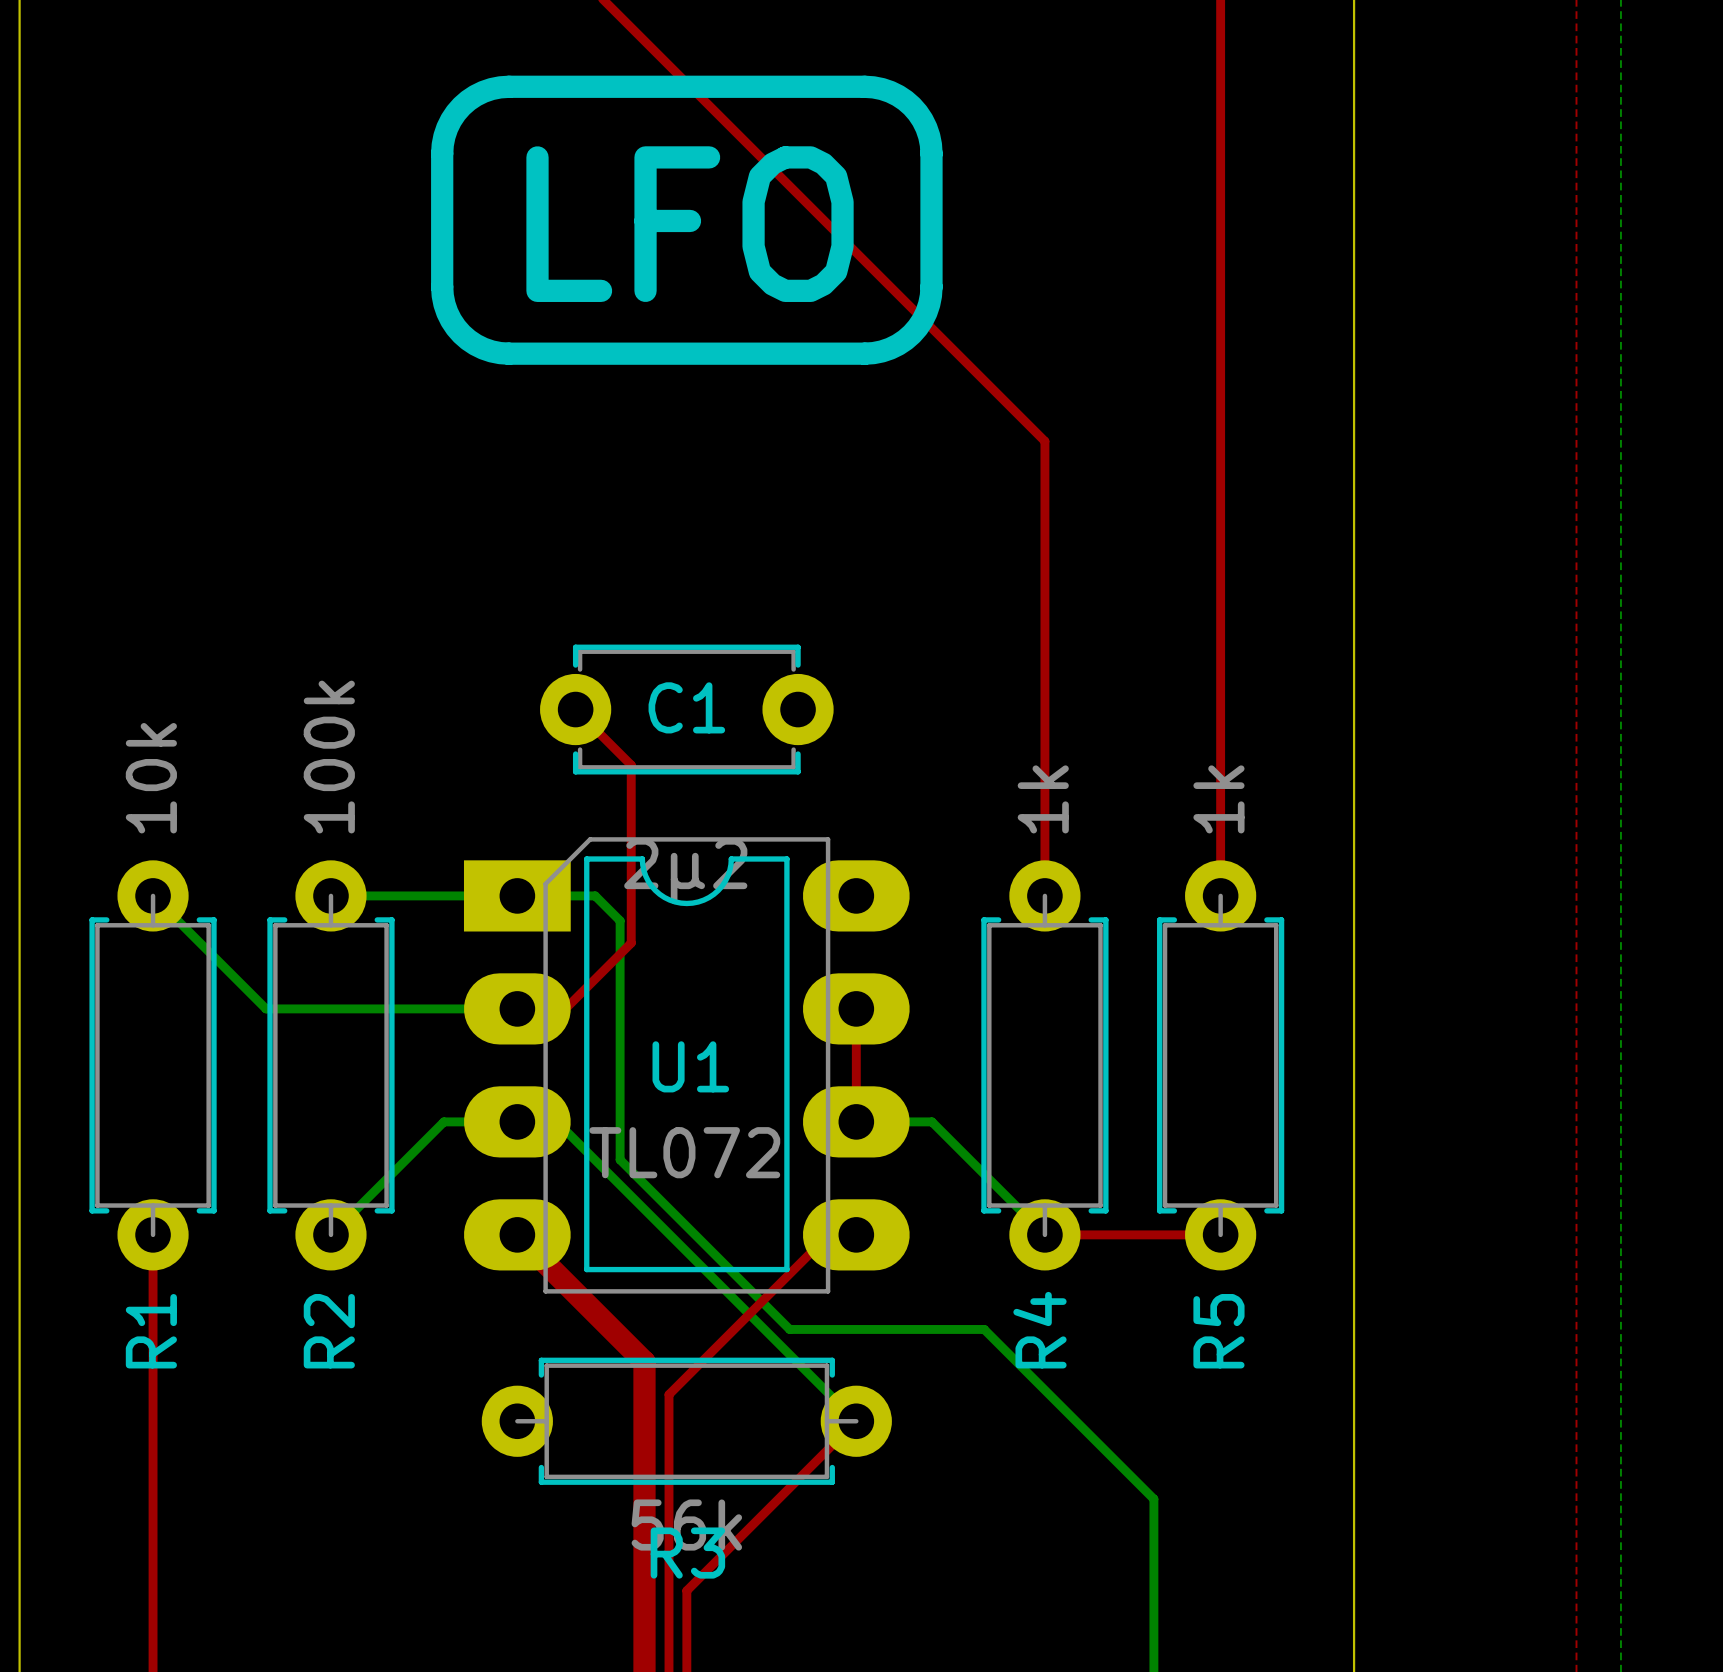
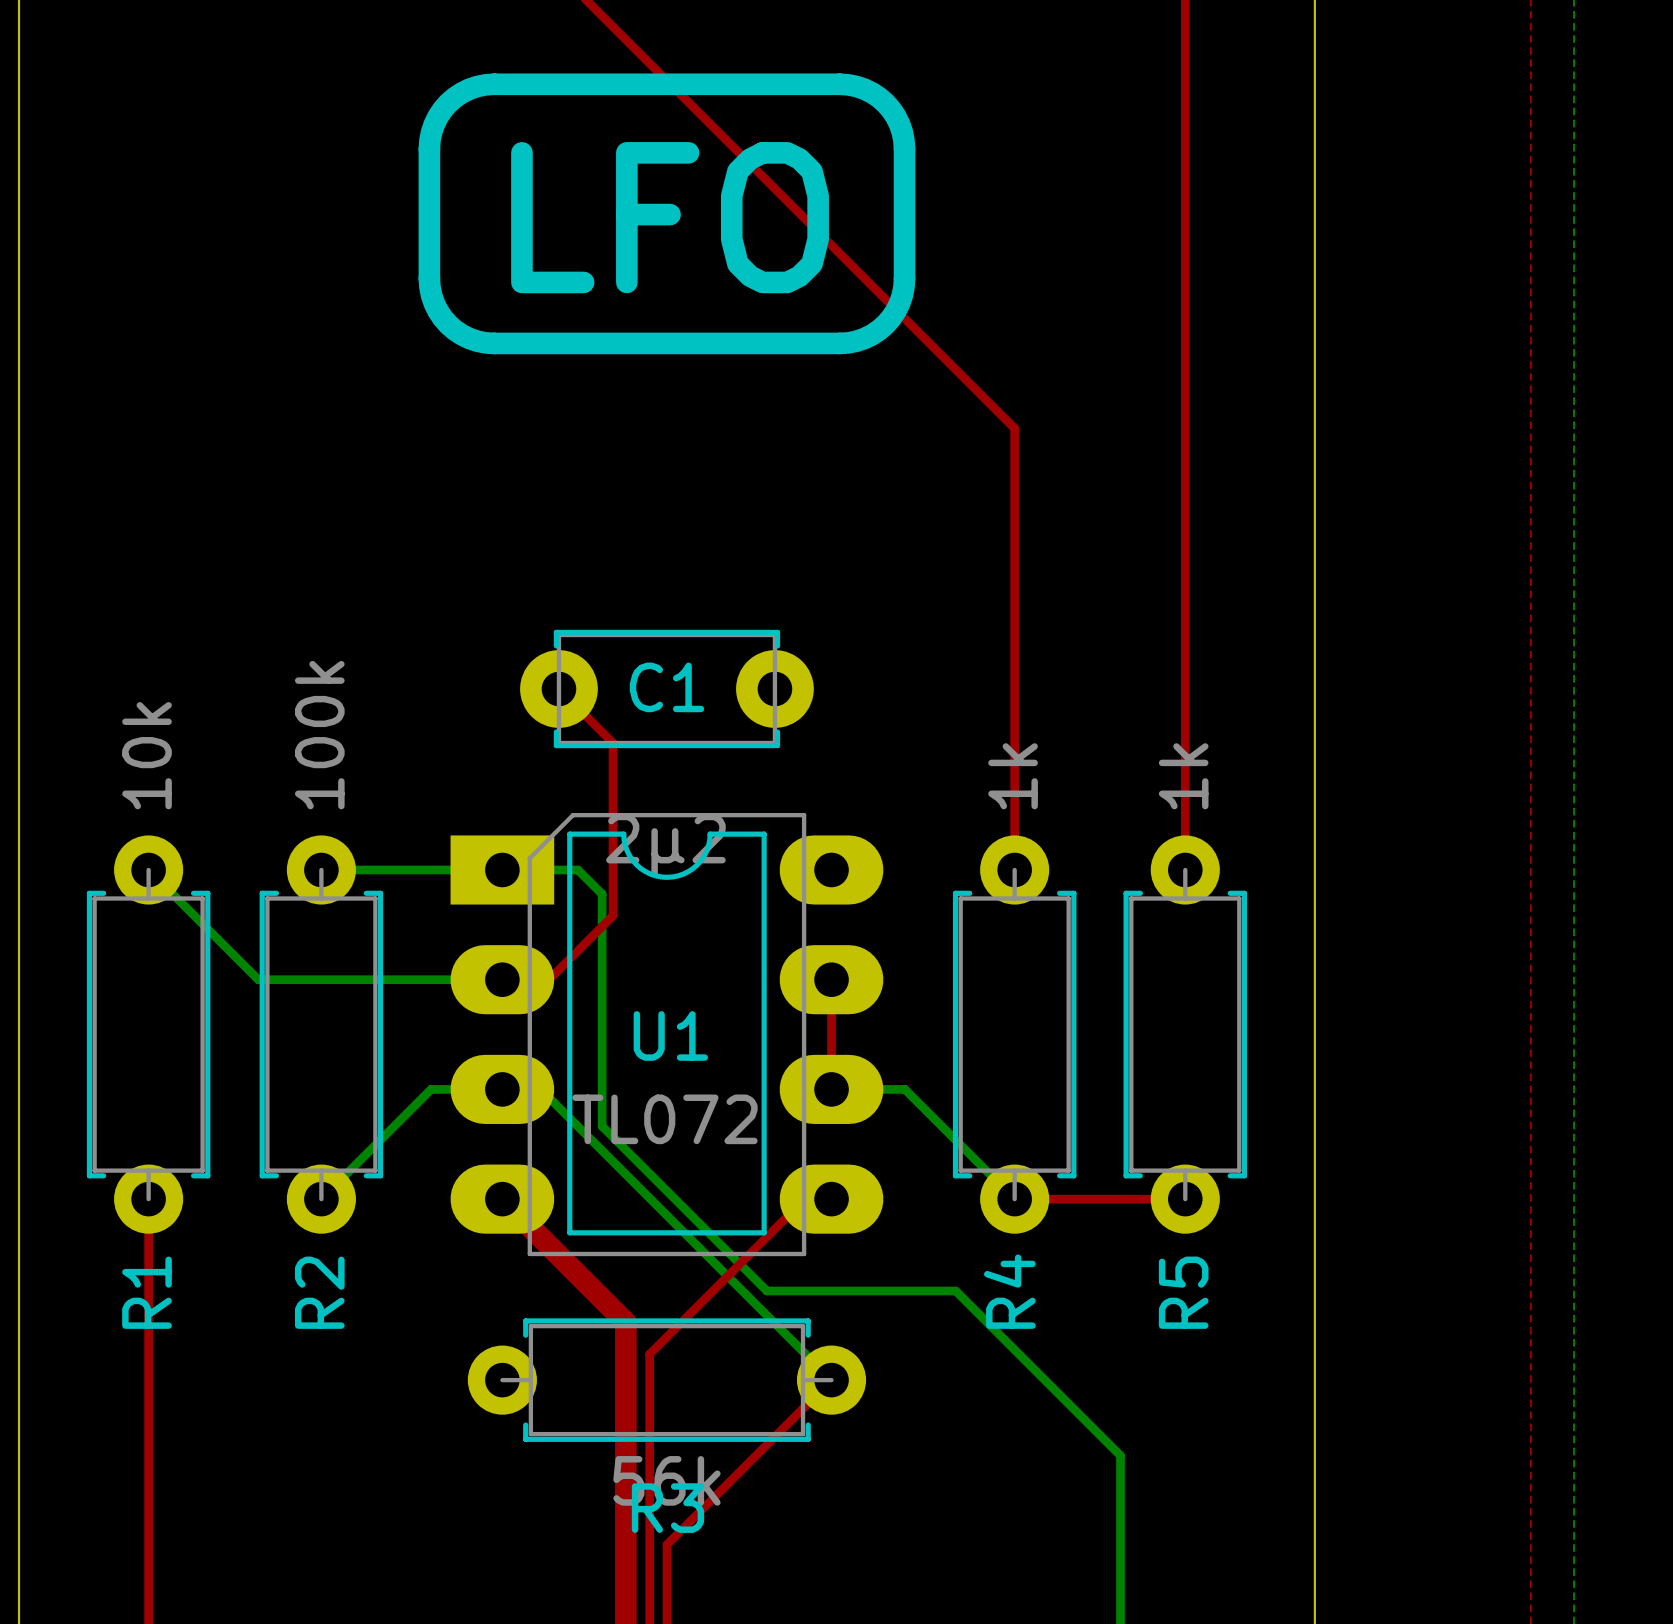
C1 footprint: [540, 644, 834, 775] -> [520, 629, 814, 749]

